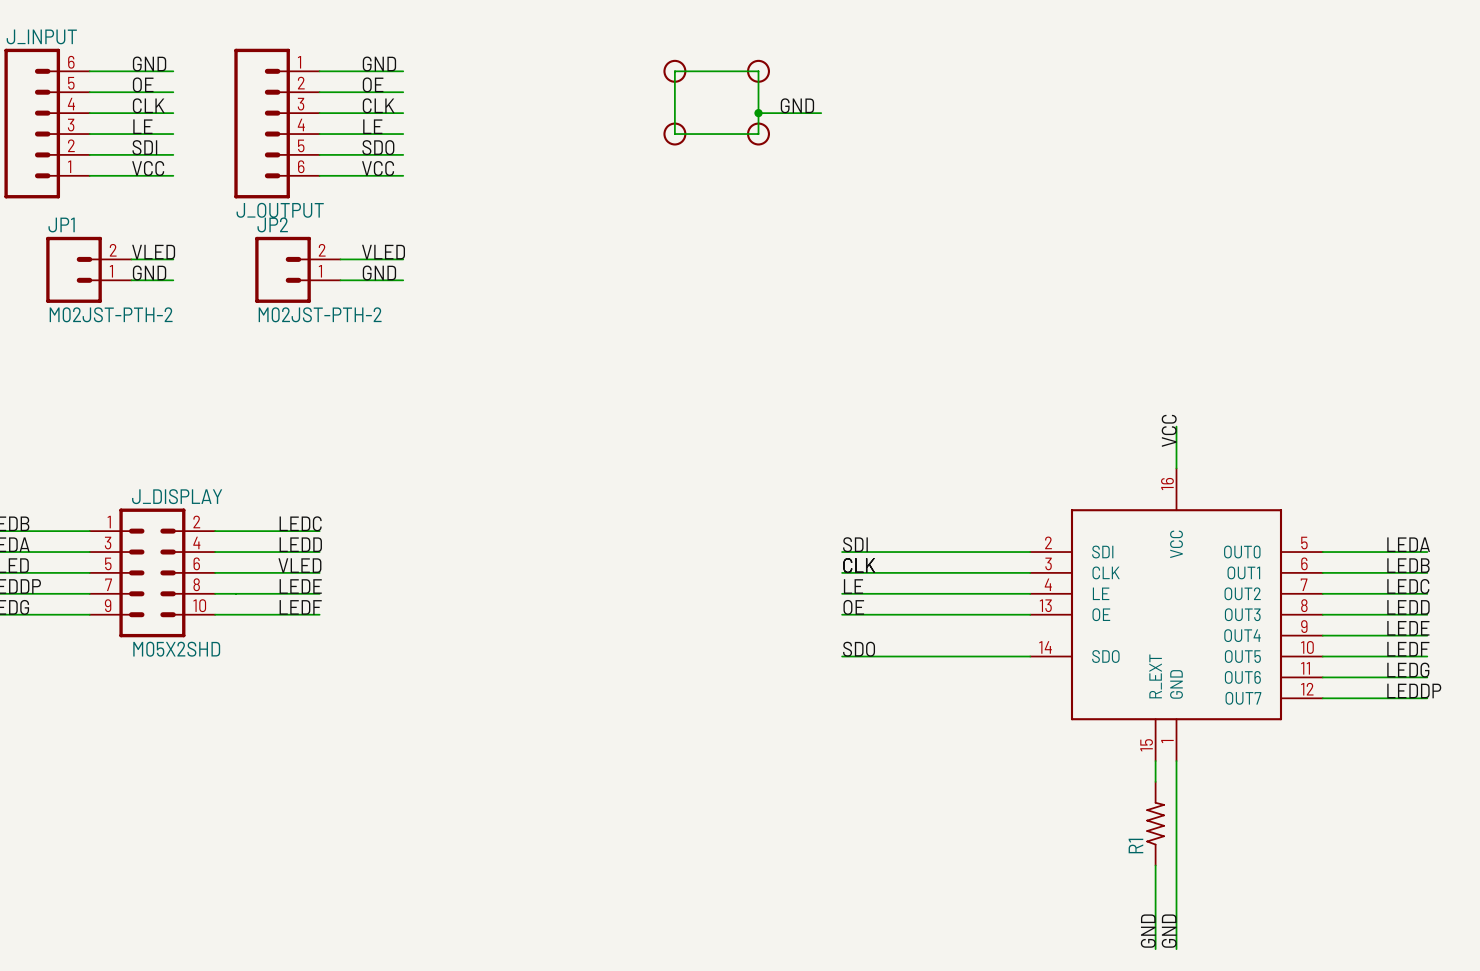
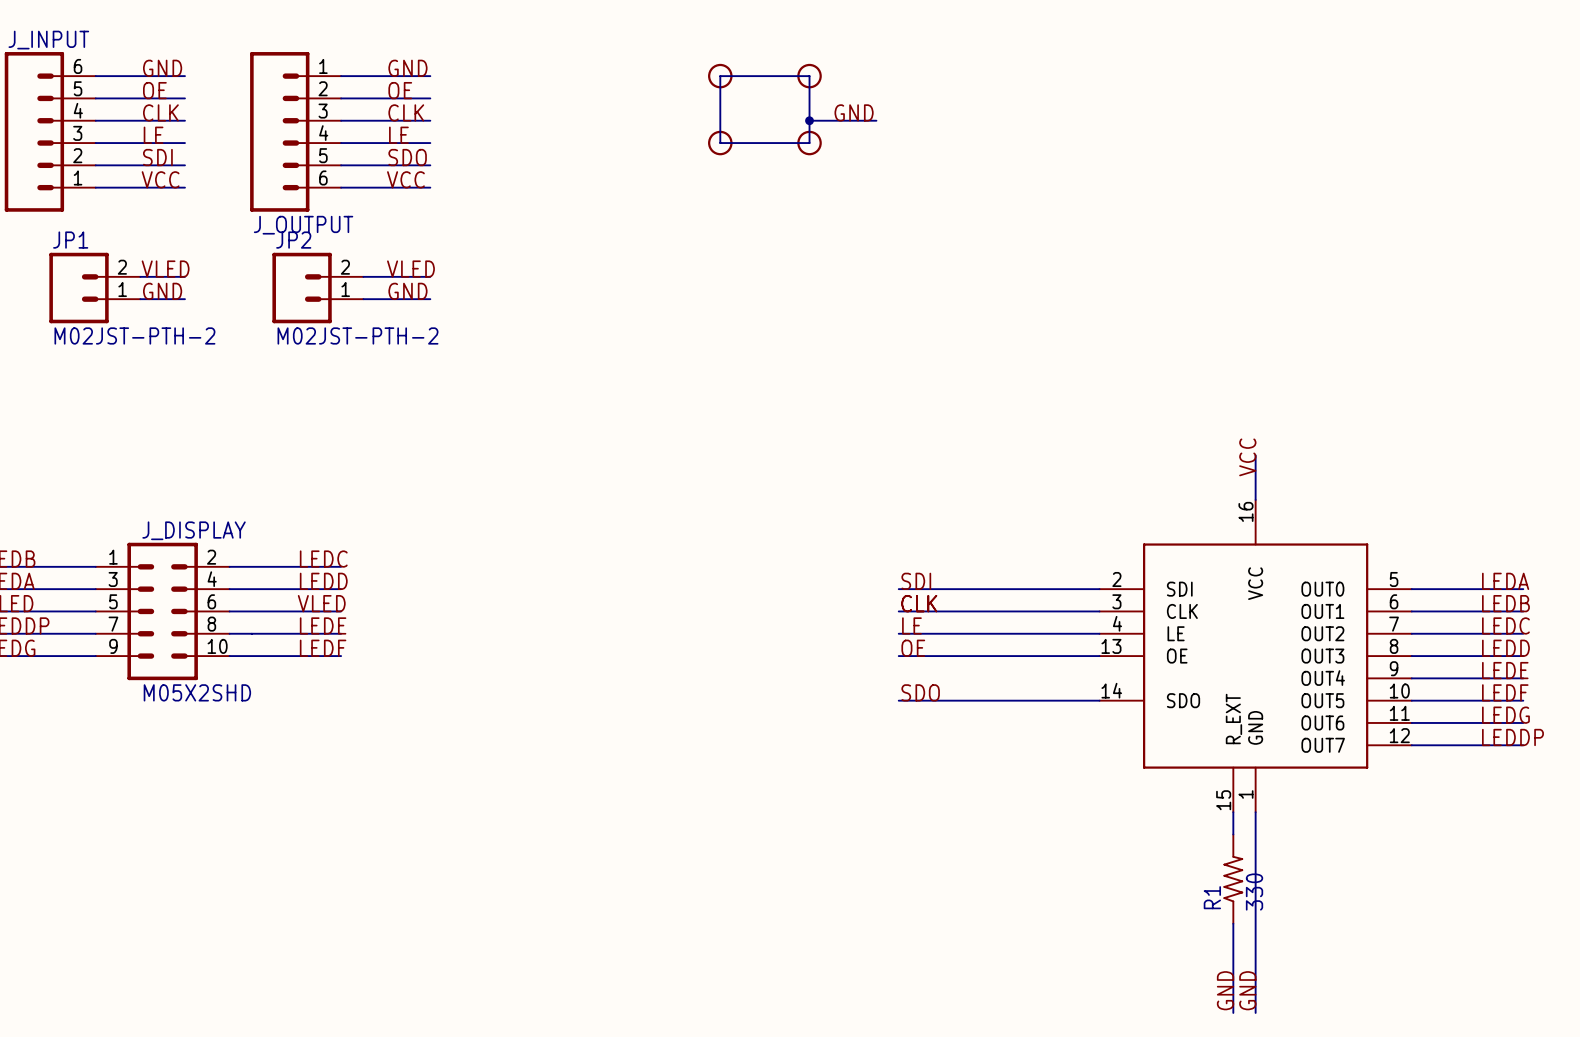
R1 value: none -> 330 (1254, 892)

